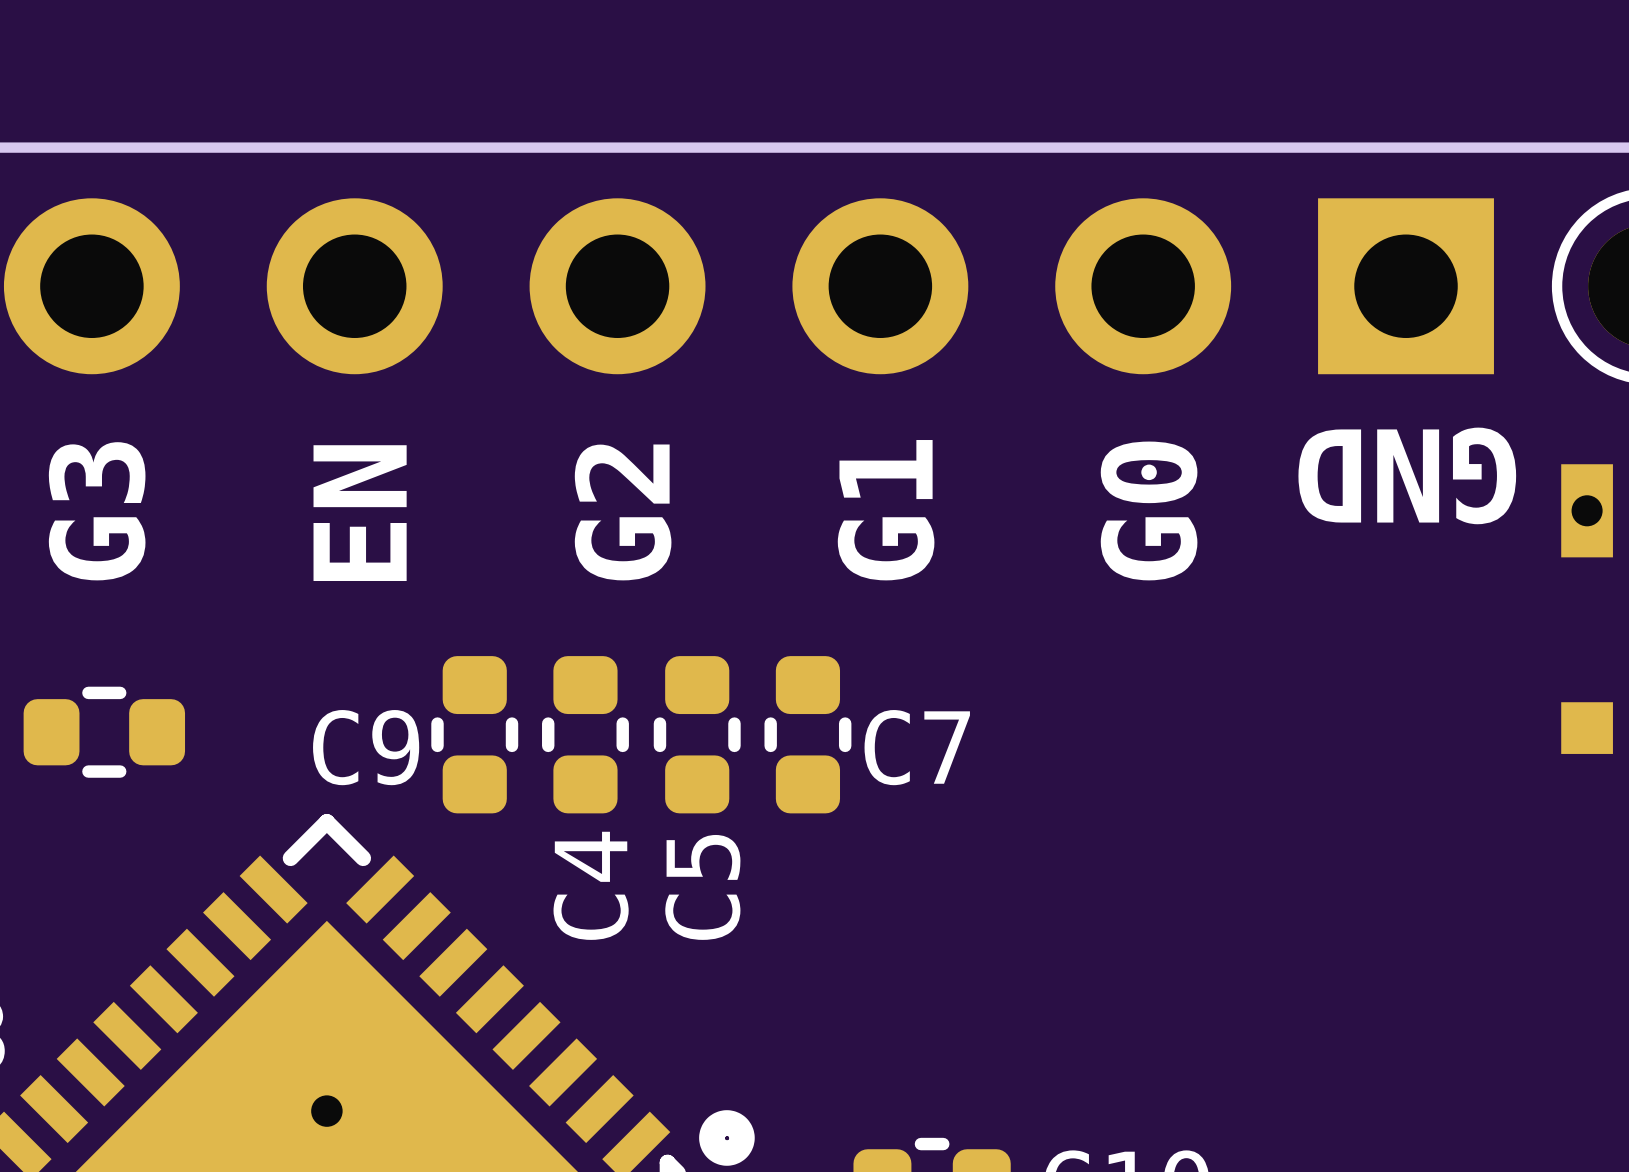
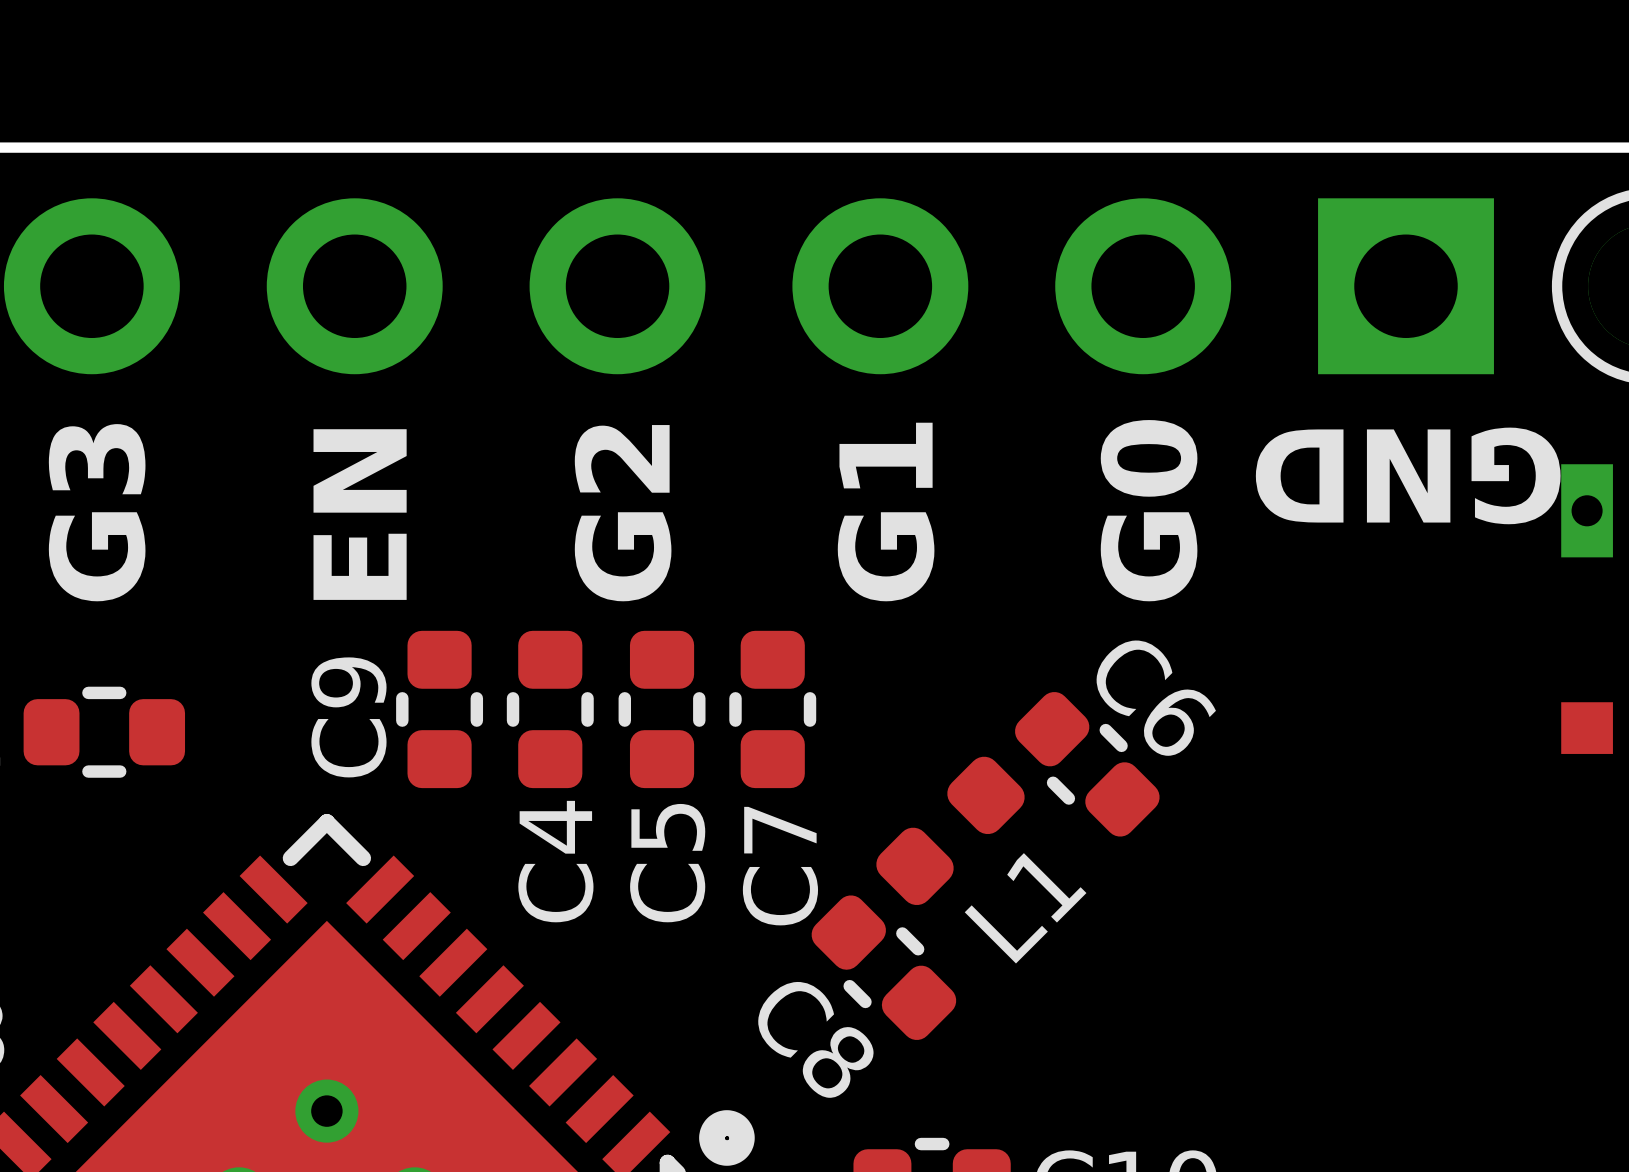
C9 position: (474, 734) -> (439, 709)
C4 position: (585, 734) -> (550, 709)
C5 position: (697, 734) -> (662, 709)
C7 position: (807, 734) -> (772, 709)
C9 name rotation: 0° (366, 747) -> 90° counterclockwise (348, 717)
C7 name rotation: 0° (917, 747) -> 90° counterclockwise (780, 866)
C6: none -> (1087, 764)
L1: none -> (950, 830)
C8: none -> (883, 967)

